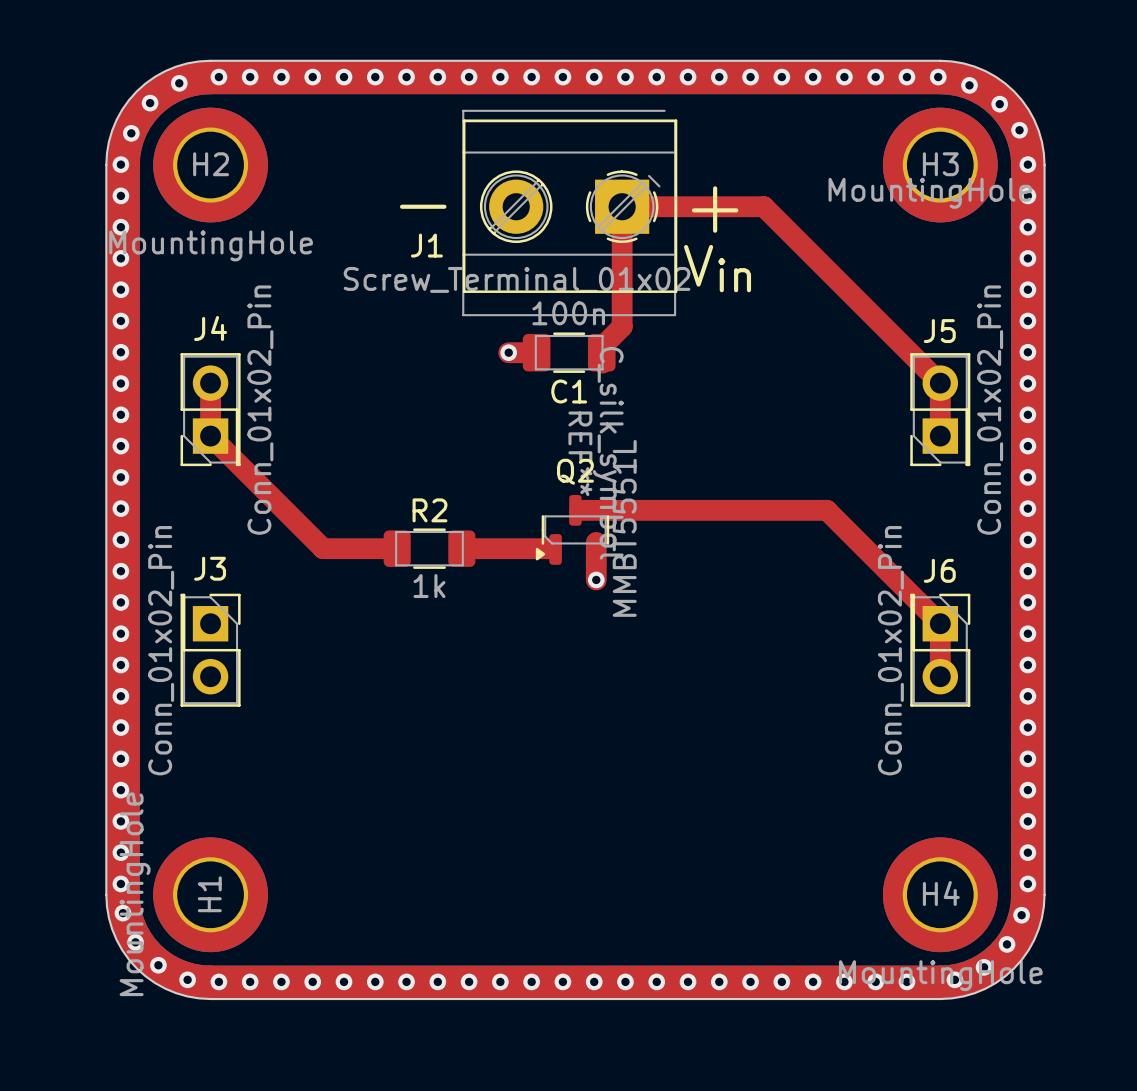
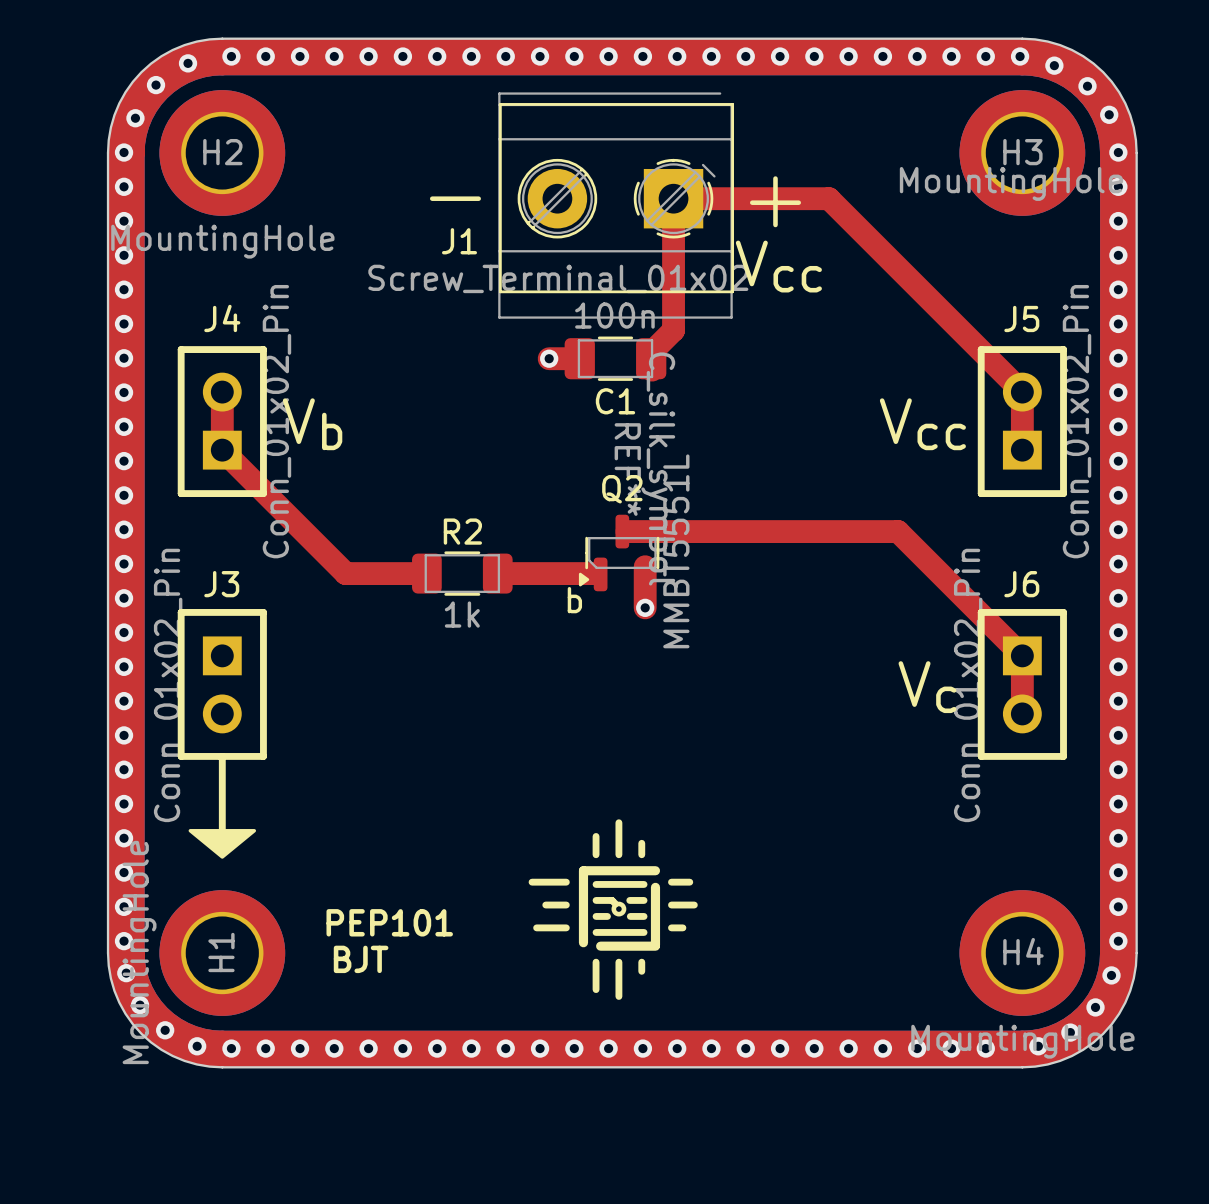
J1 text: Vin (717, 268) -> Vcc (778, 266)
J4 footprint: [180, 353, 241, 467] -> [177, 346, 267, 498]
J5 footprint: [910, 353, 971, 467] -> [977, 346, 1067, 498]
text: none -> Vb (312, 424)
text: none -> Vcc (922, 424)
text: none -> b (574, 600)
J3 footprint: [180, 593, 241, 707] -> [177, 609, 267, 760]
J6 footprint: [910, 593, 971, 707] -> [977, 609, 1067, 760]
text: none -> Vc (927, 687)
line: none -> (222, 756) (222, 829)
drawing: none -> [528, 819, 698, 1000]
drawing: none -> [188, 829, 257, 859]
text: none -> PEP101 (389, 922)
text: none -> BJT (361, 959)

